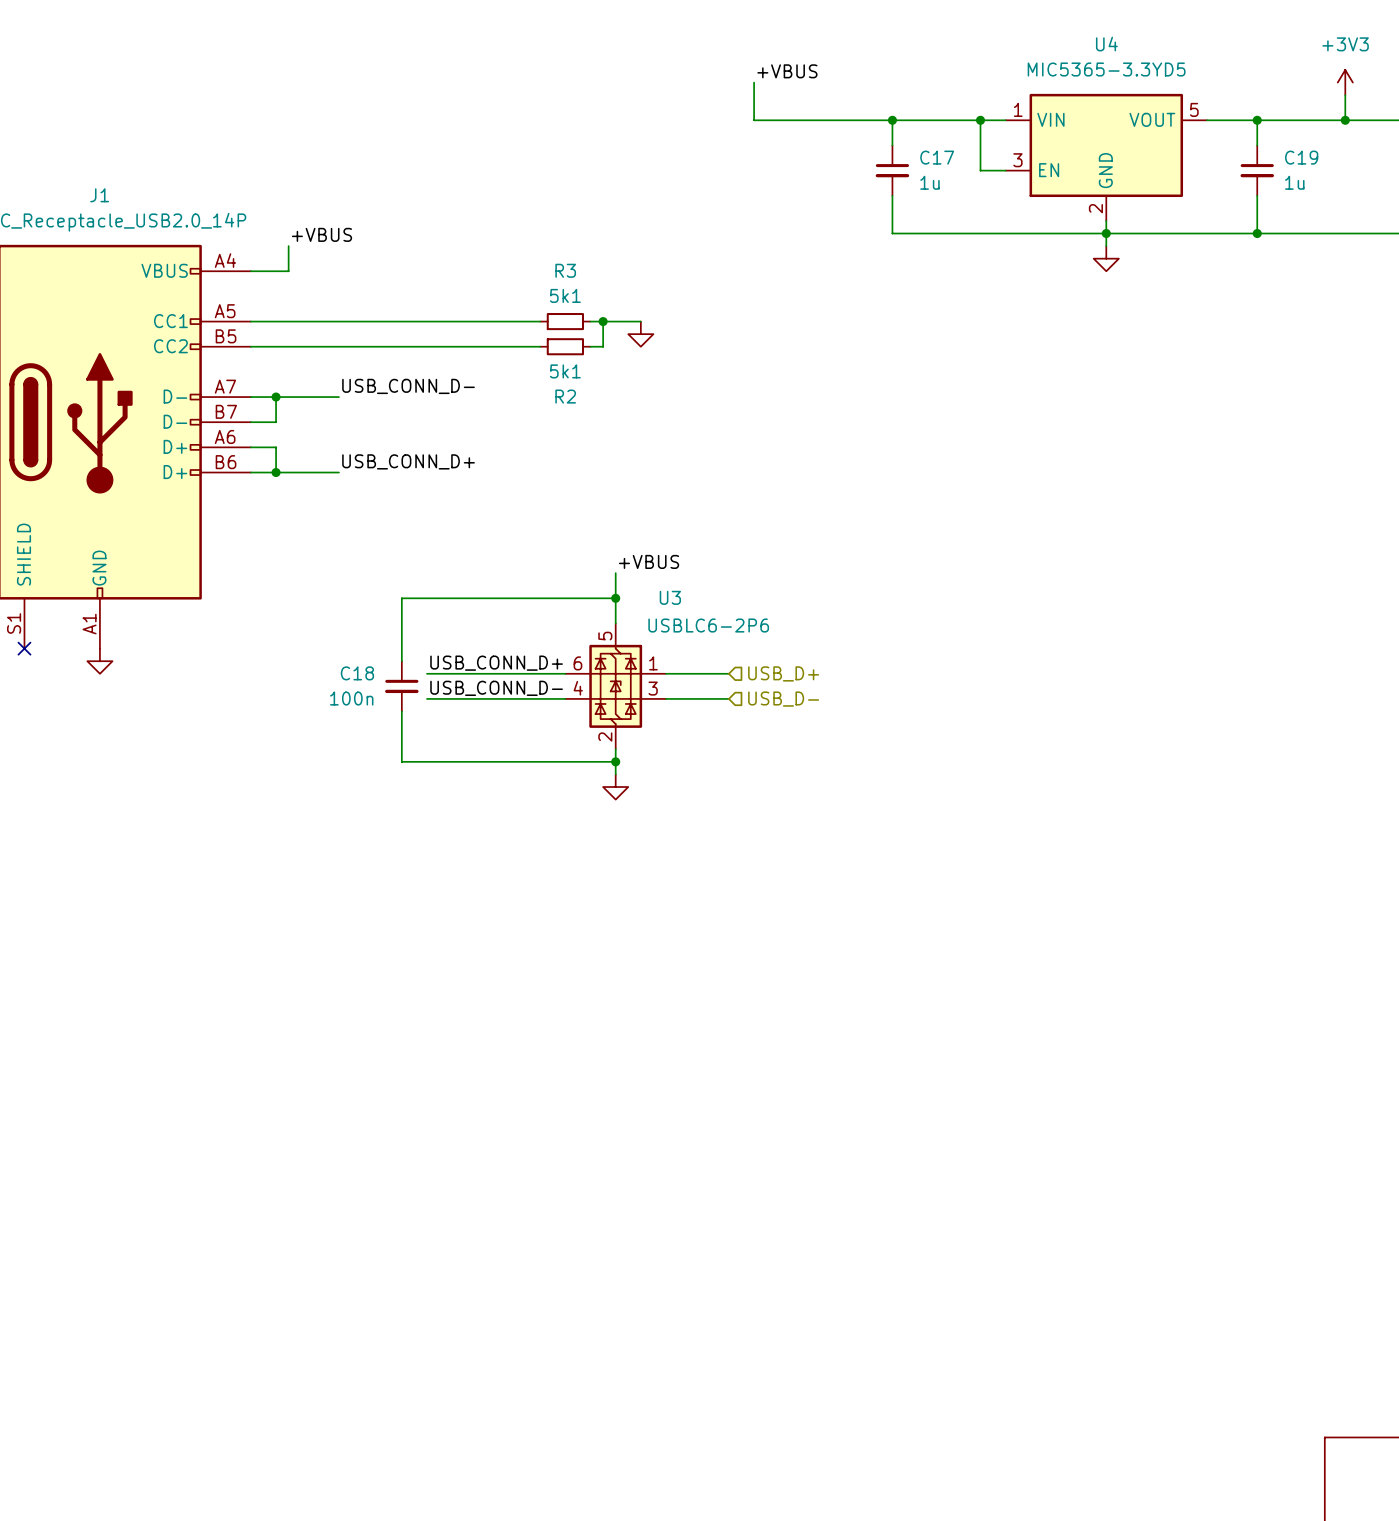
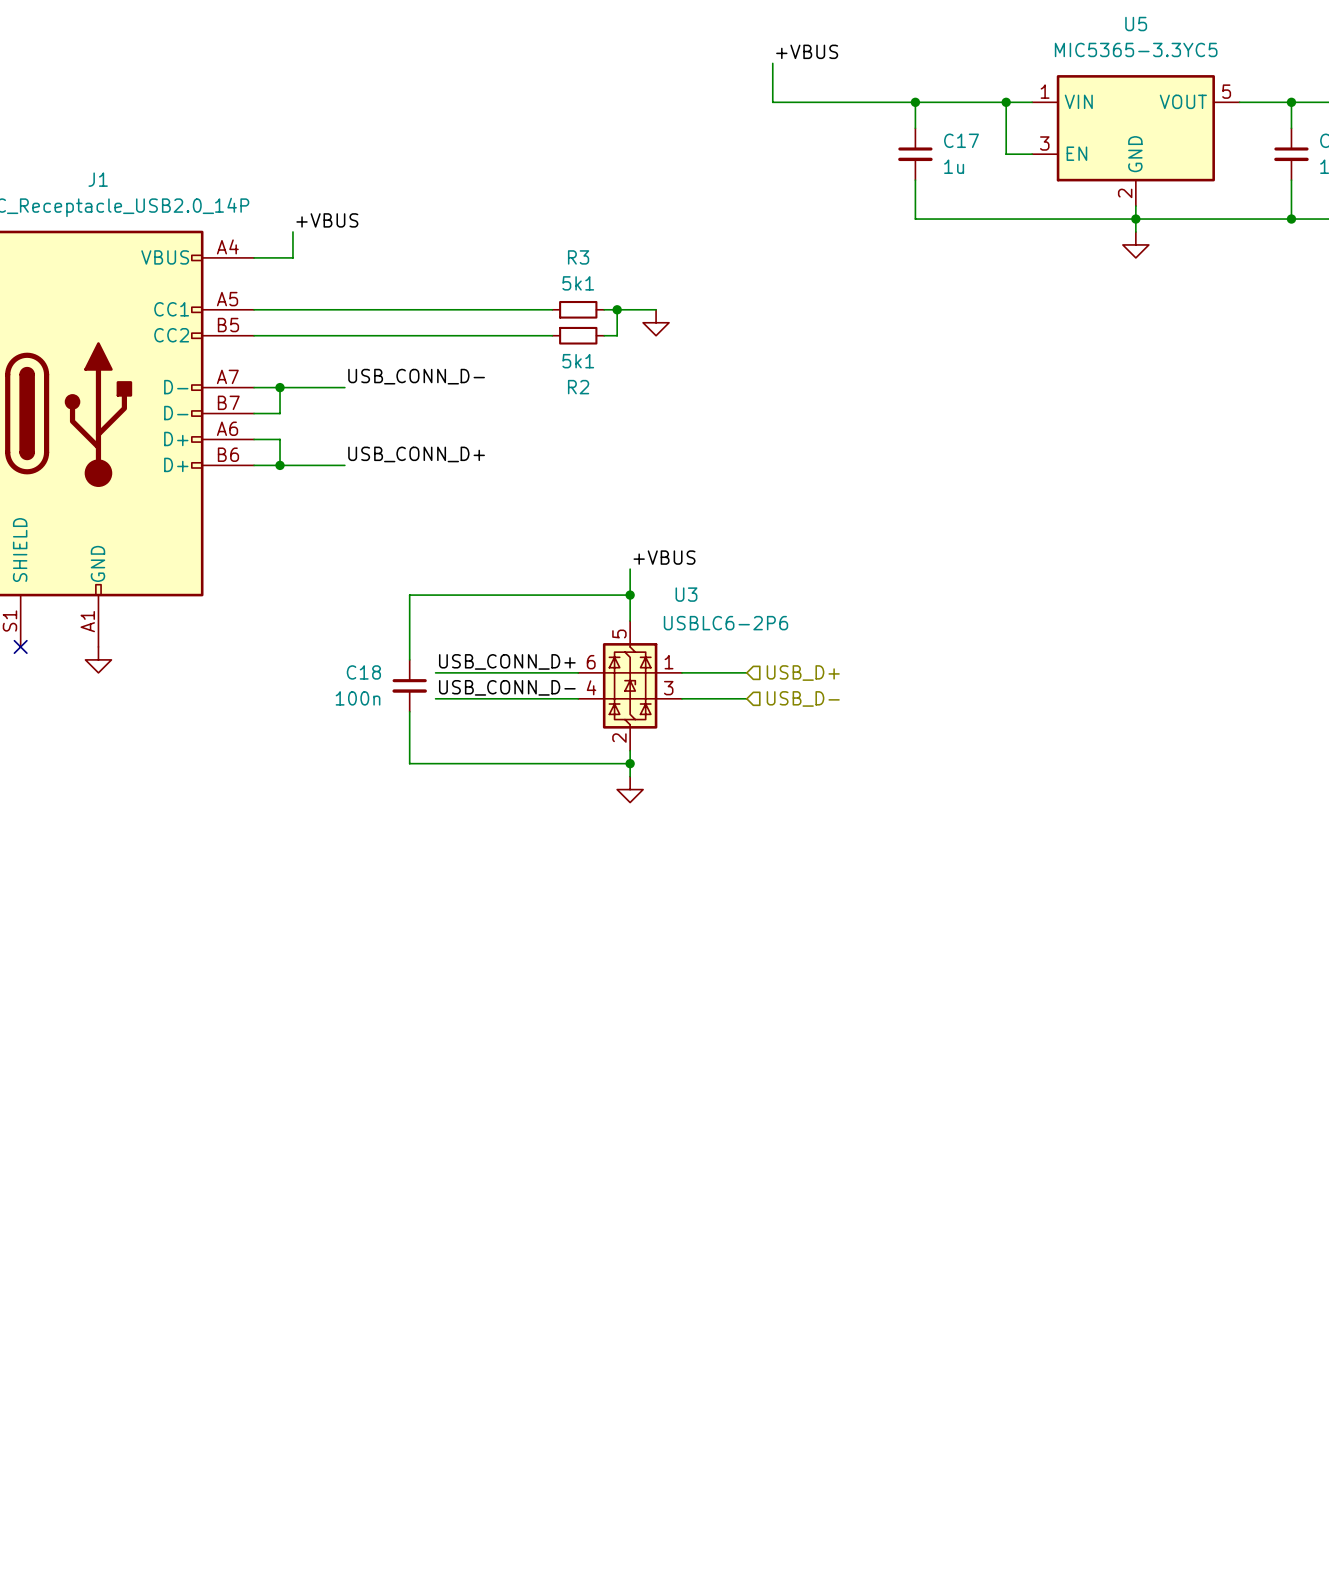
U4 name: U4 (1106, 44) -> U5 (1136, 24)
U4 value: MIC5365-3.3YD5 (1106, 69) -> MIC5365-3.3YC5 (1136, 49)

